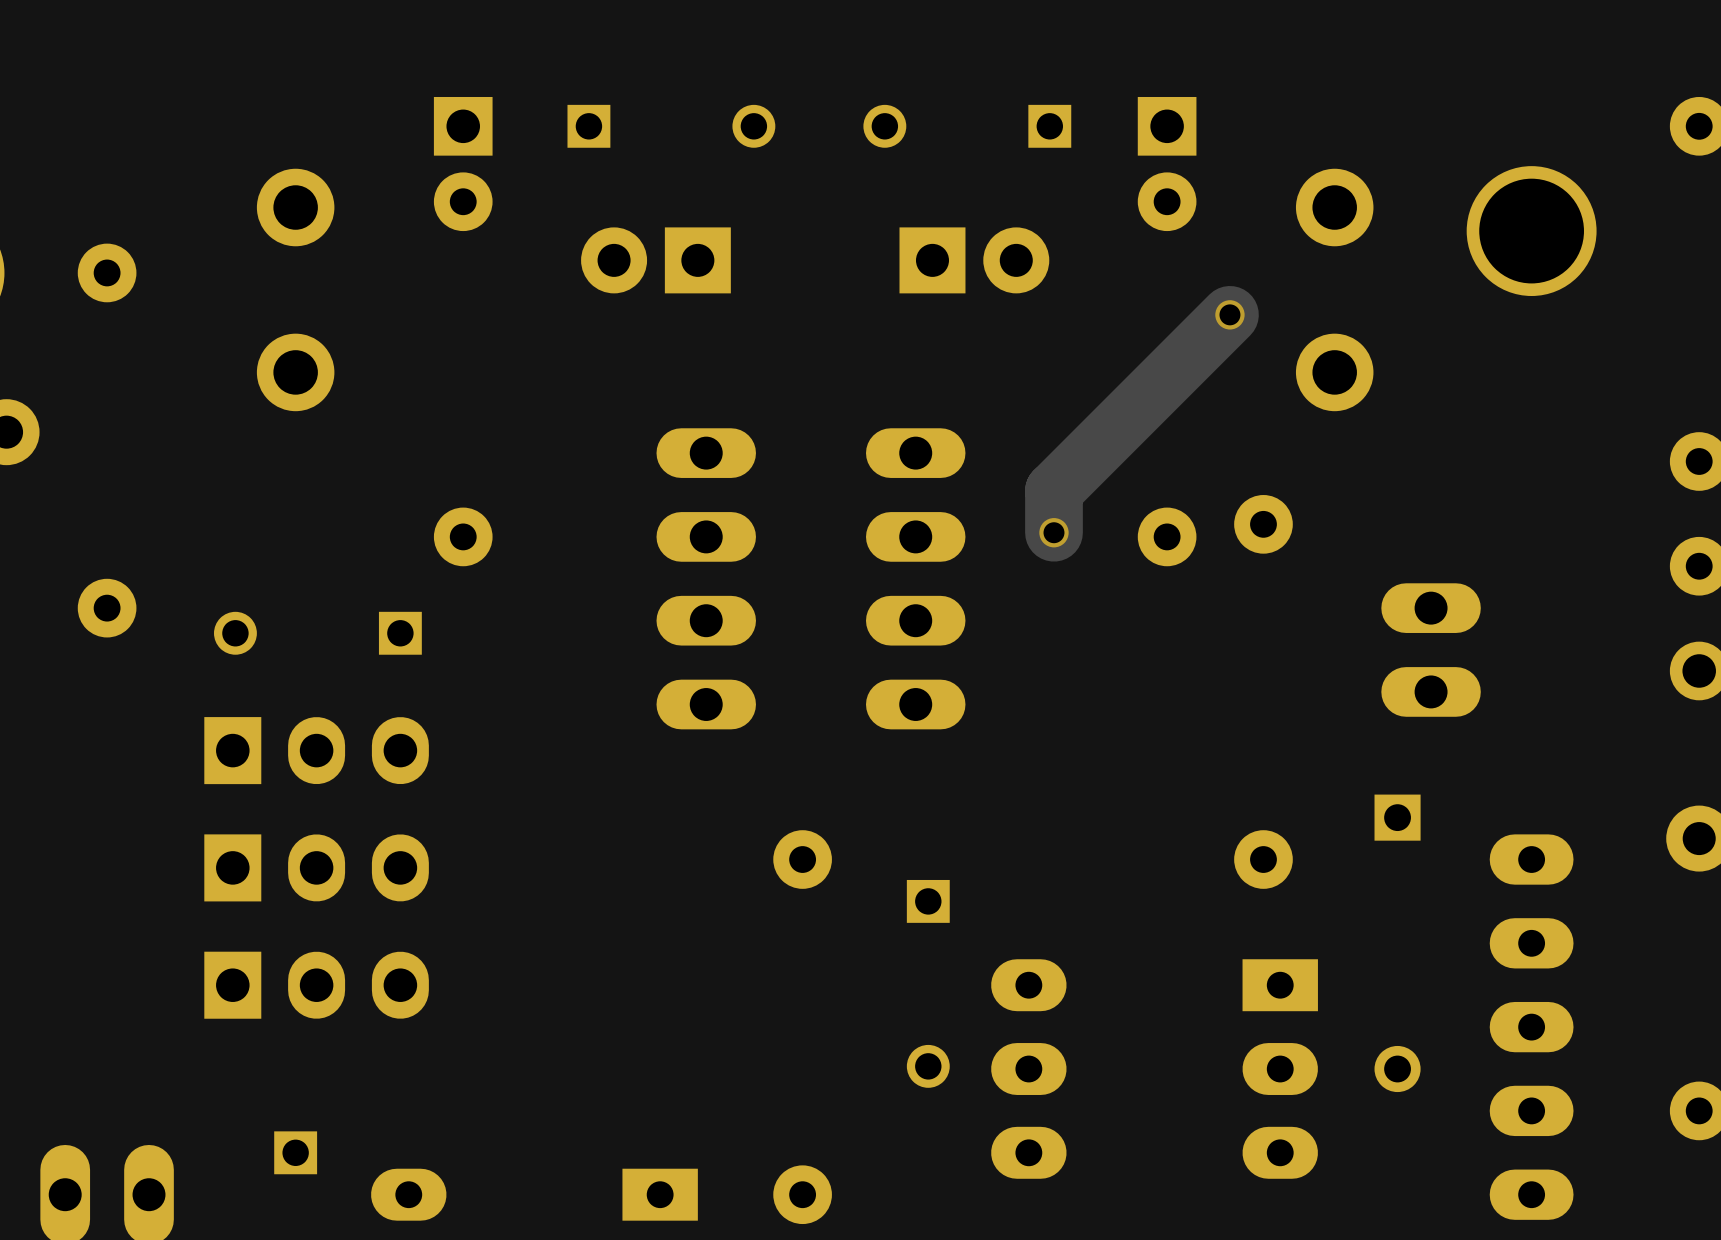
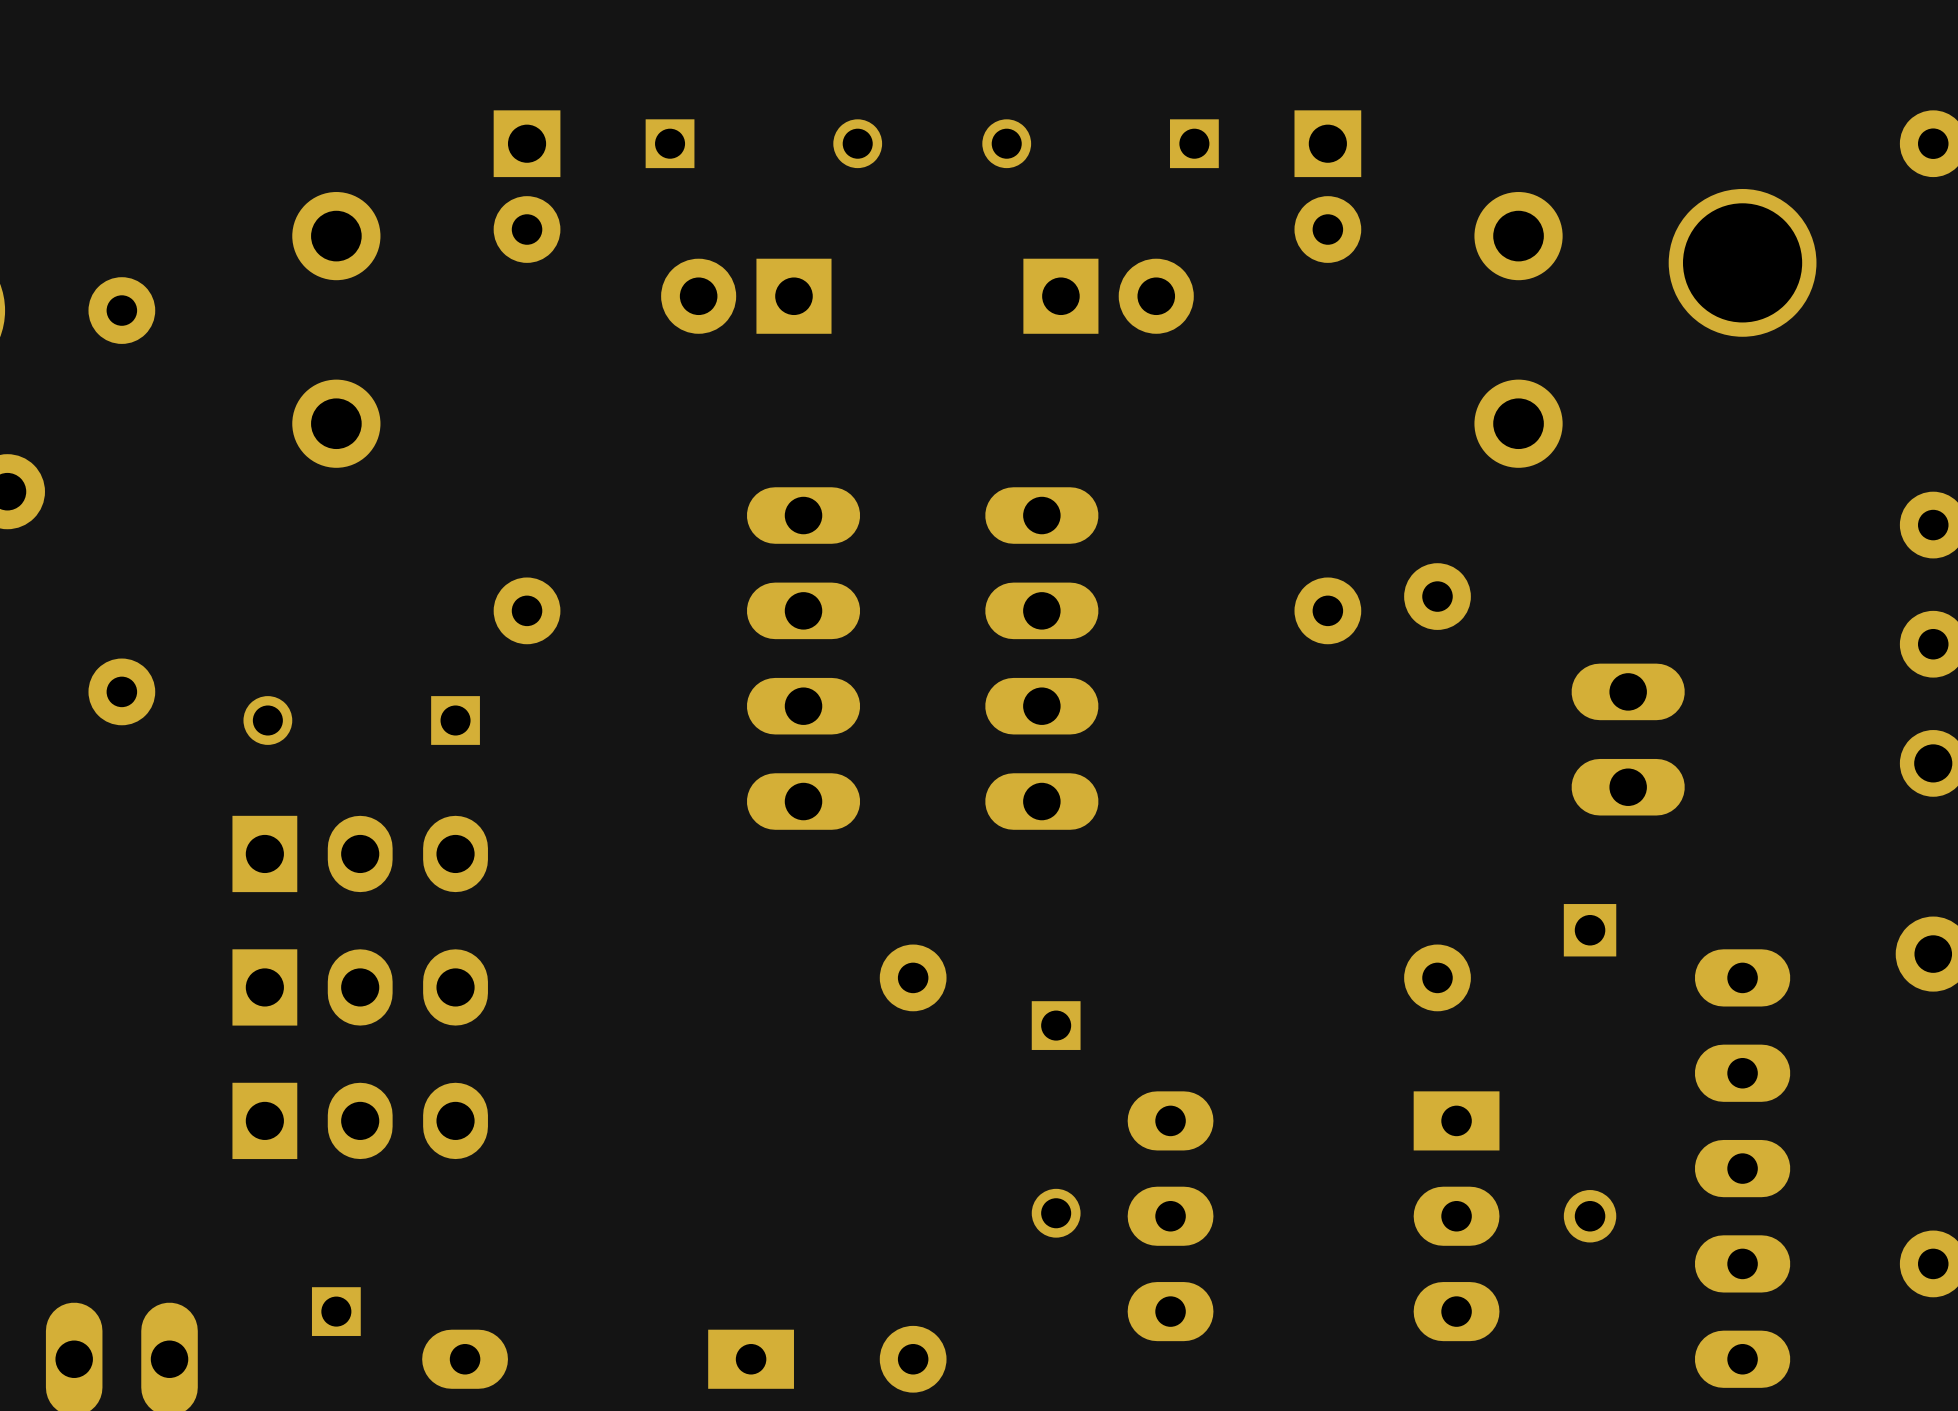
track: (1229, 314) (1053, 490) (1053, 532) -> none
via: (1229, 314) -> none
via: (1053, 532) -> none

